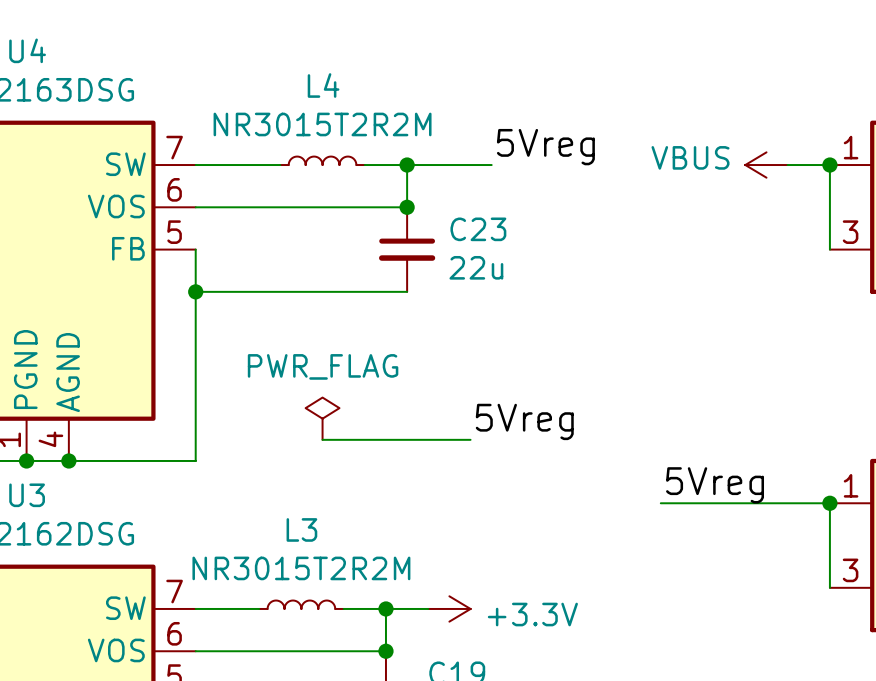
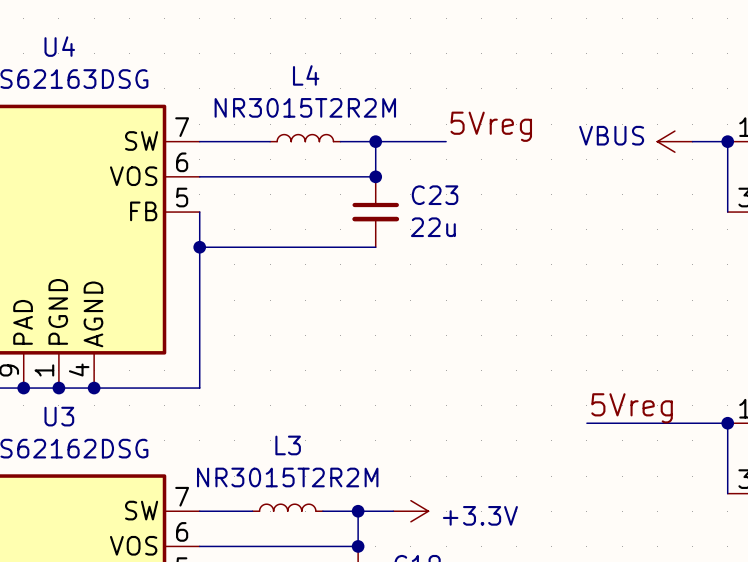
power symbol: PWR_FLAG (322, 418) -> none
label: 5Vreg (524, 421) -> none
wire: (322, 439) (470, 439) -> none

